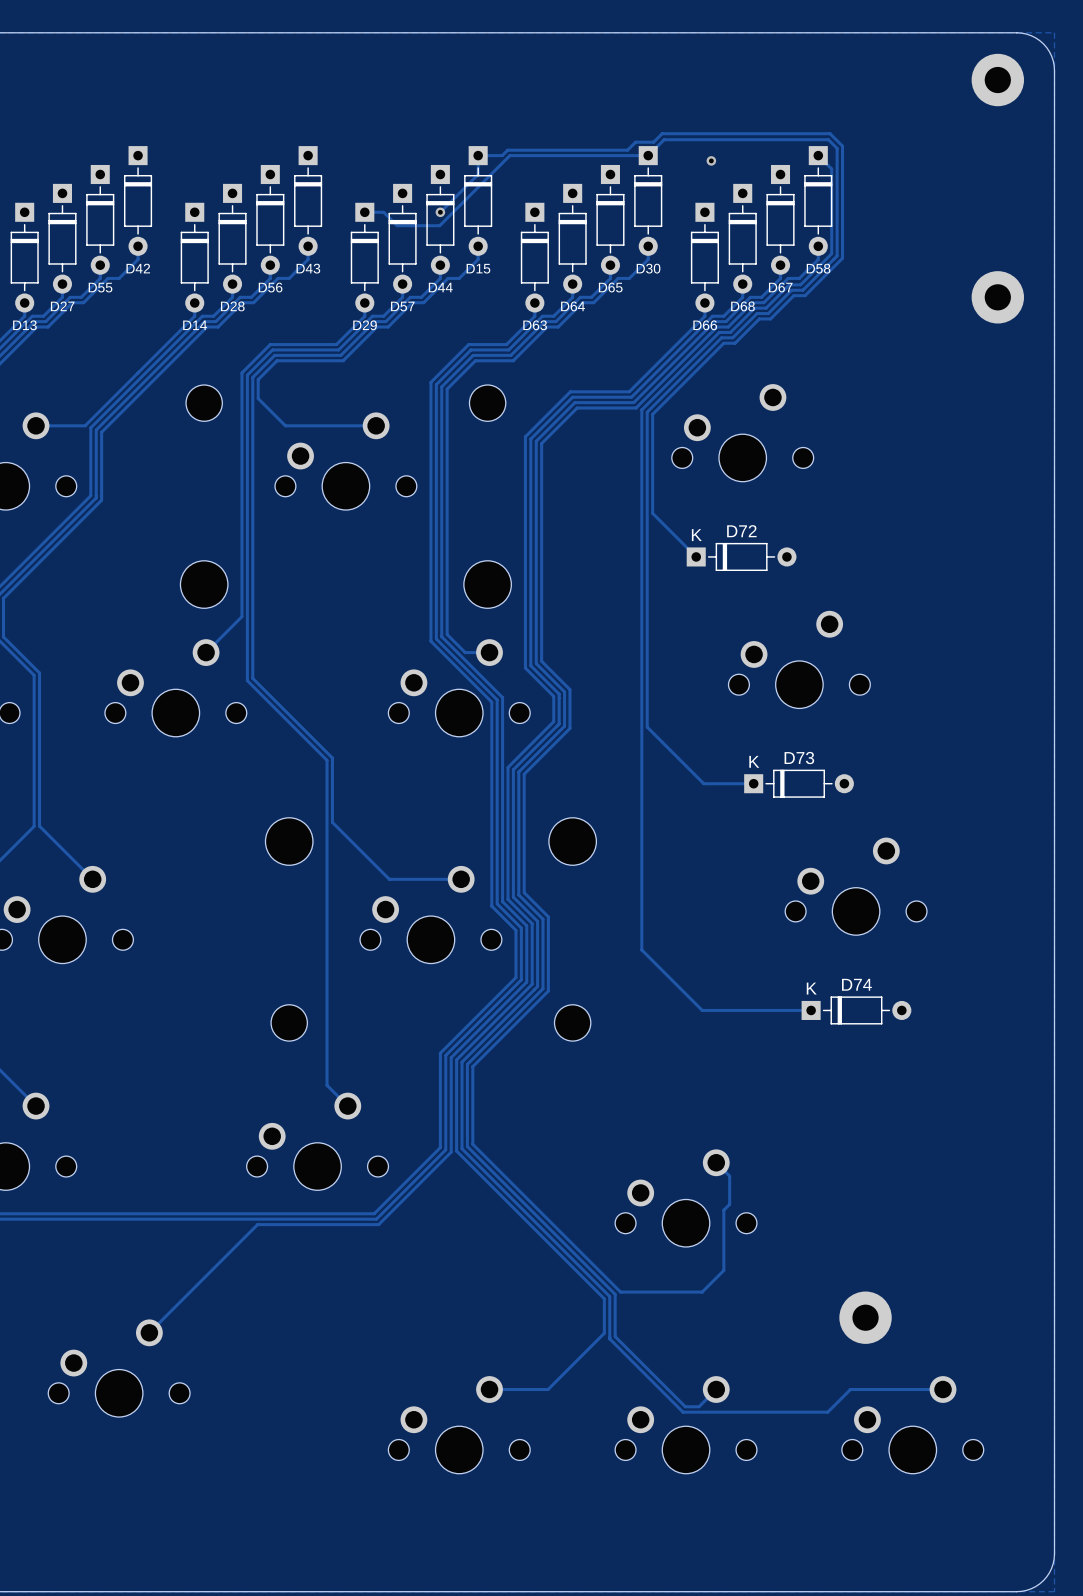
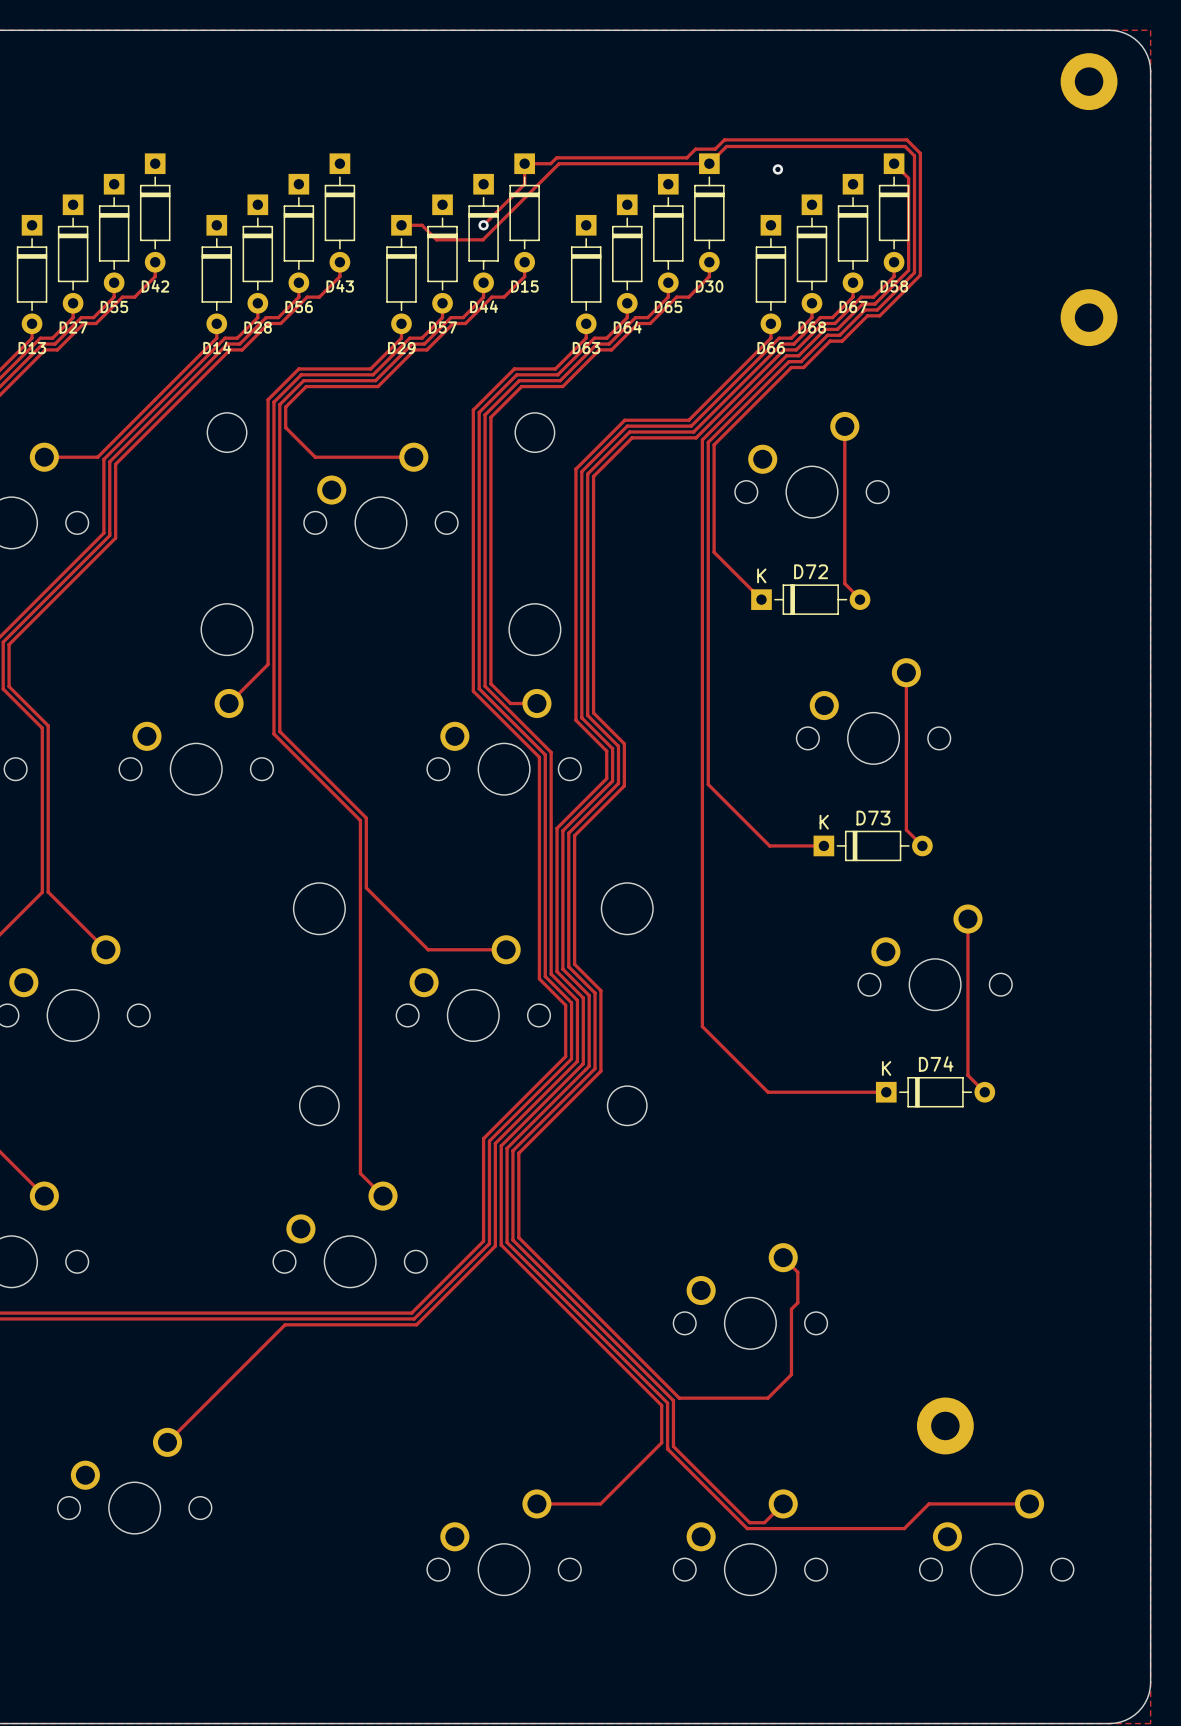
track: none -> (844, 426) (844, 583) (860, 599)
track: none -> (906, 672) (906, 829) (922, 845)
track: none -> (967, 919) (967, 1075) (984, 1092)

